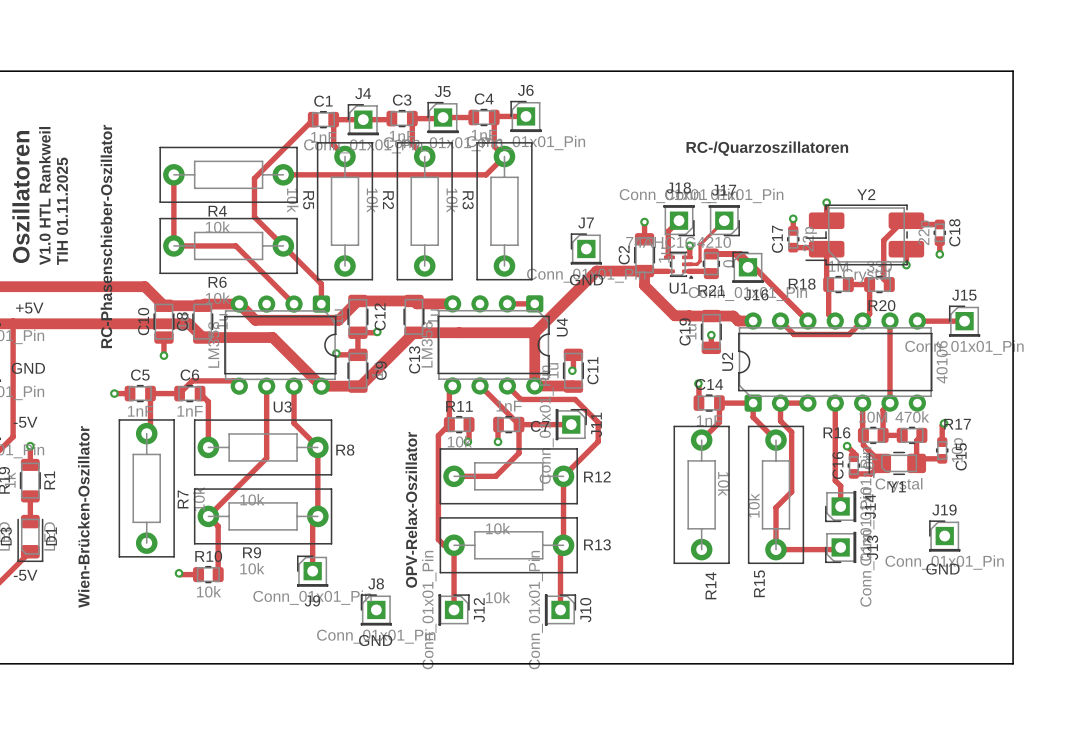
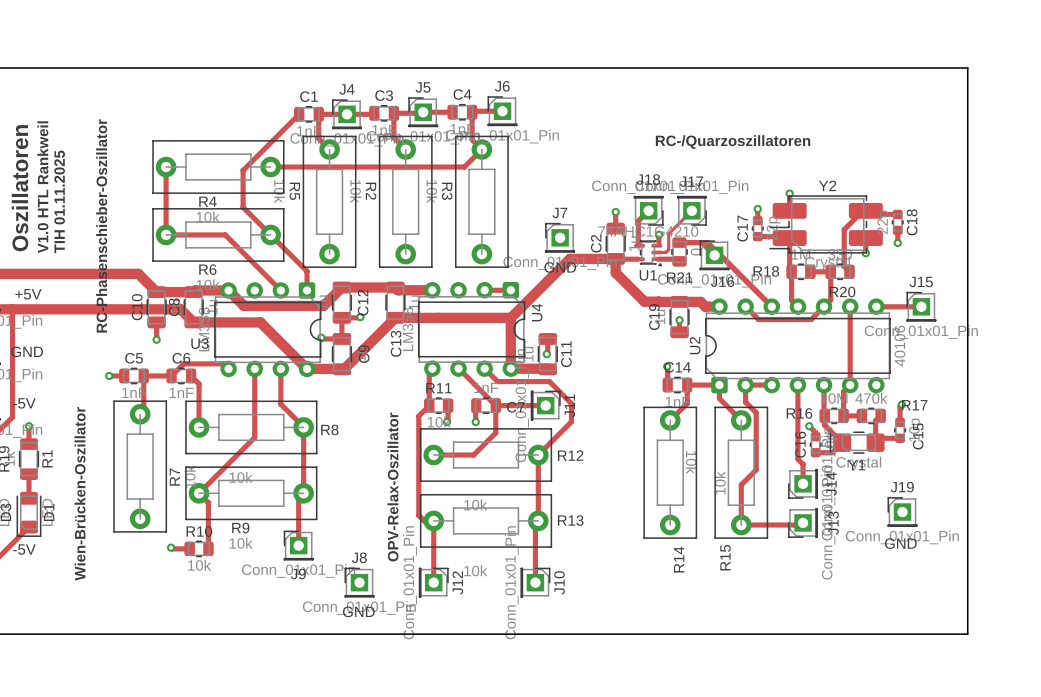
U3 name position: U3 (282, 406) -> U3 (200, 343)

